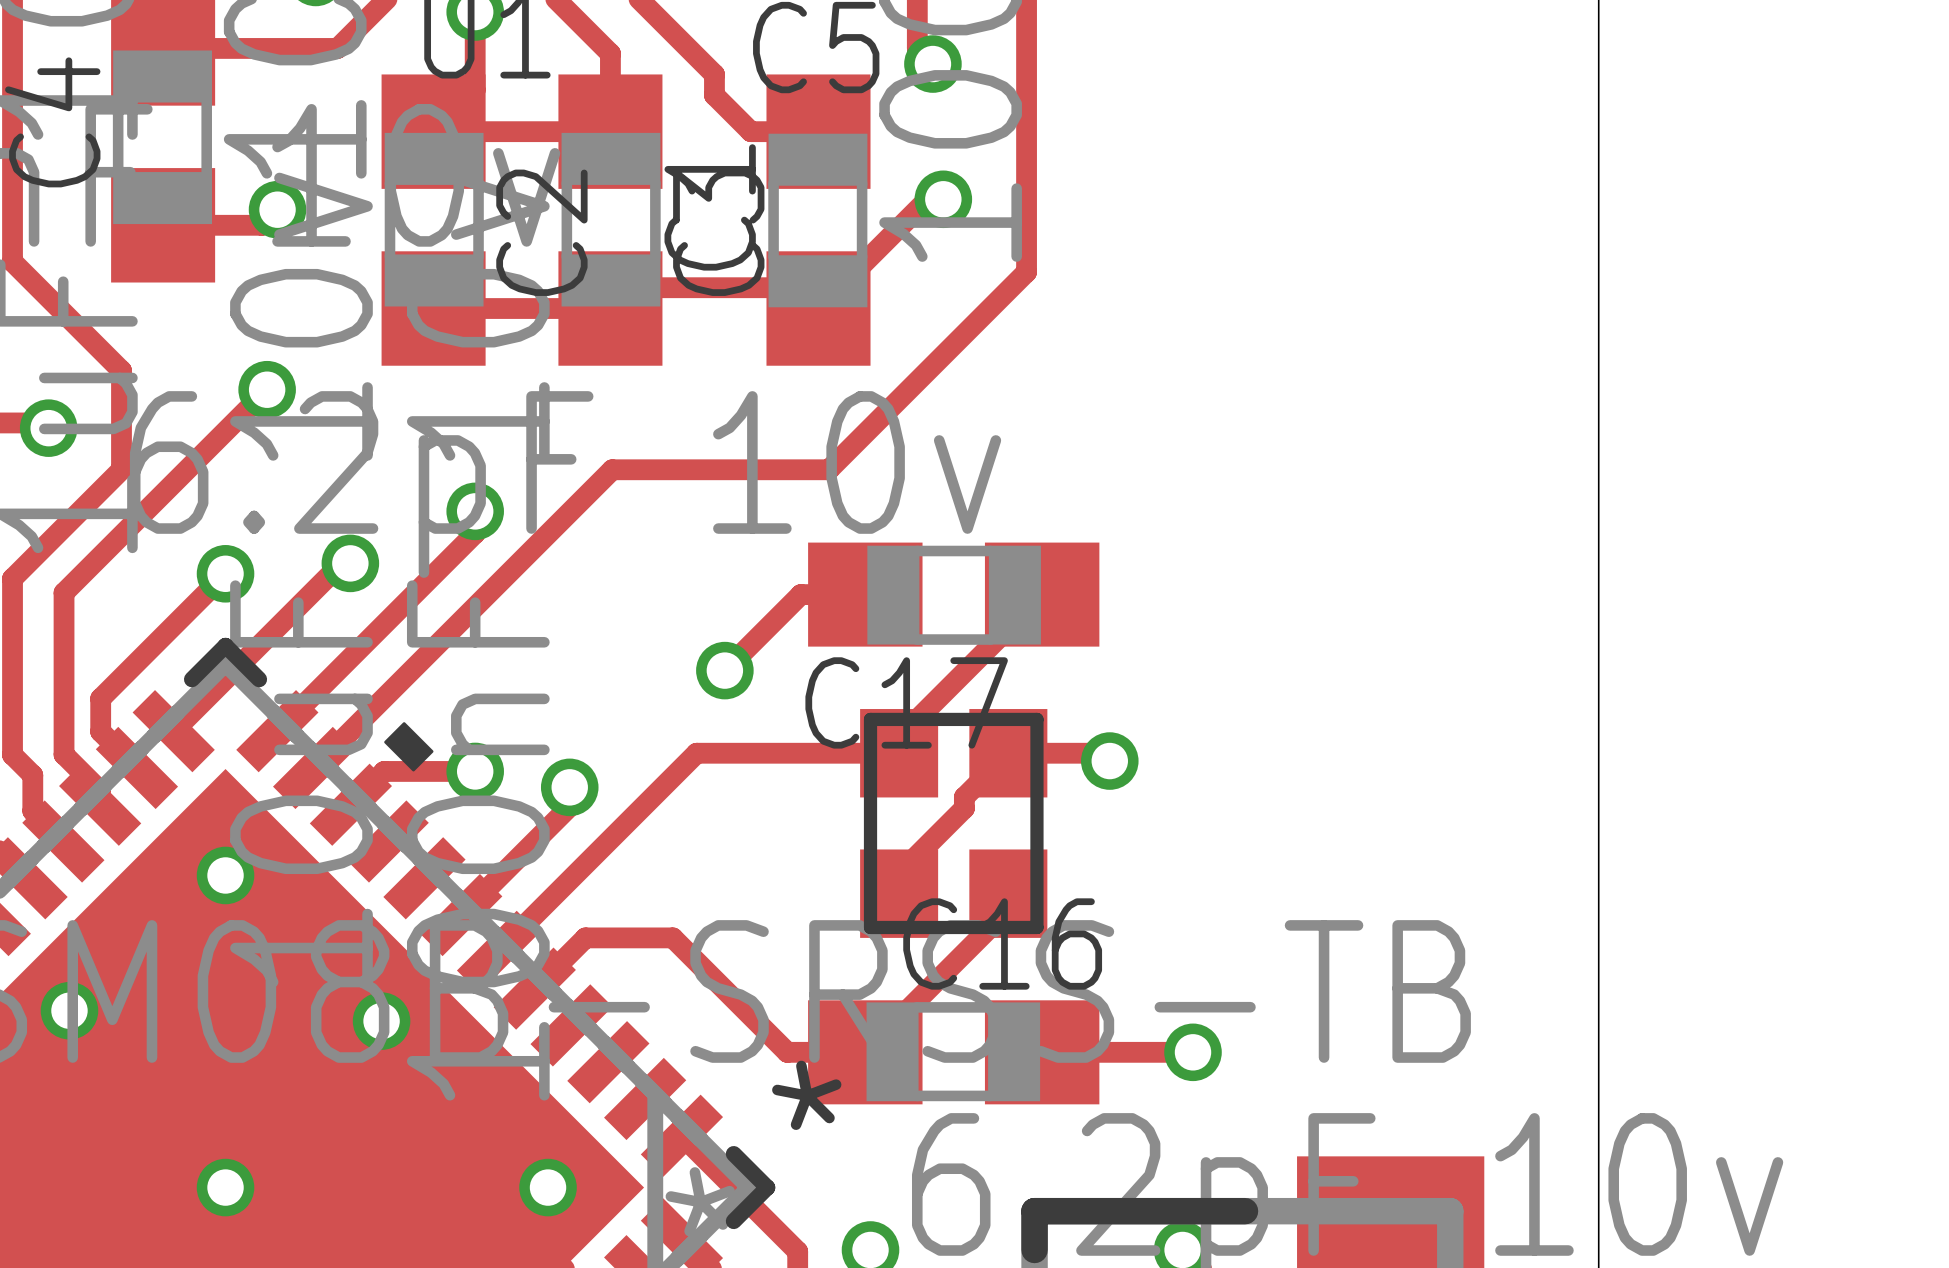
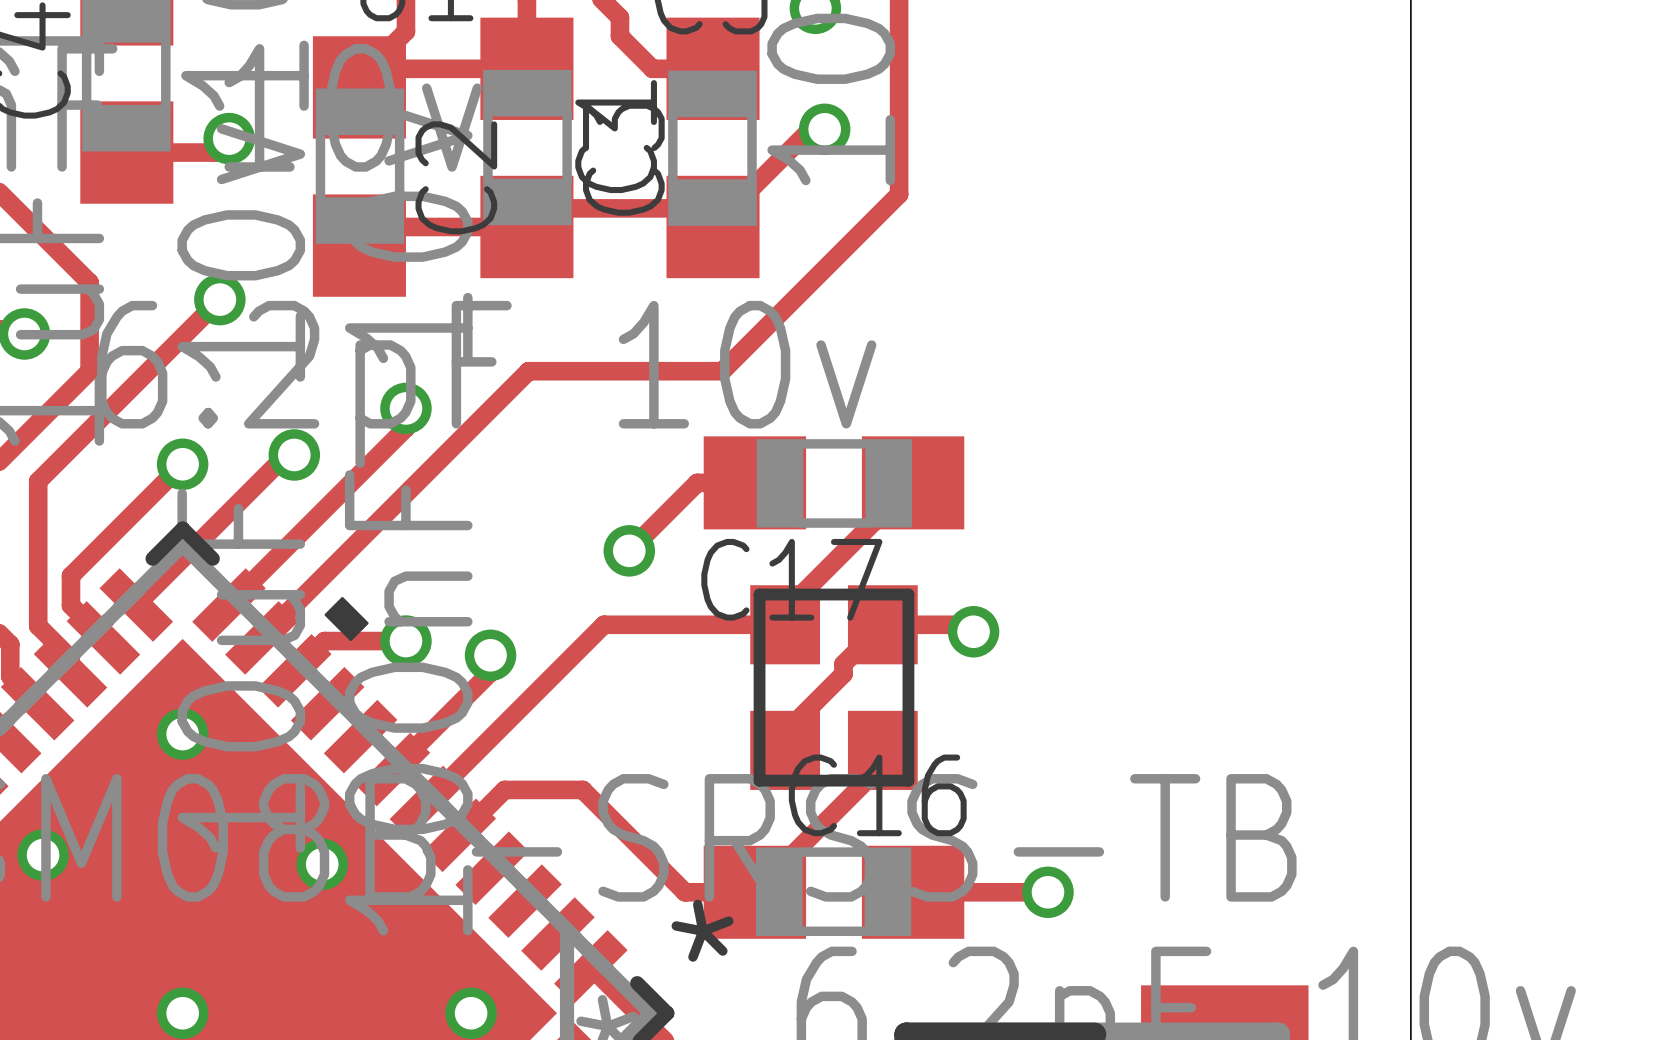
C2 position: (433, 220) -> (359, 166)

